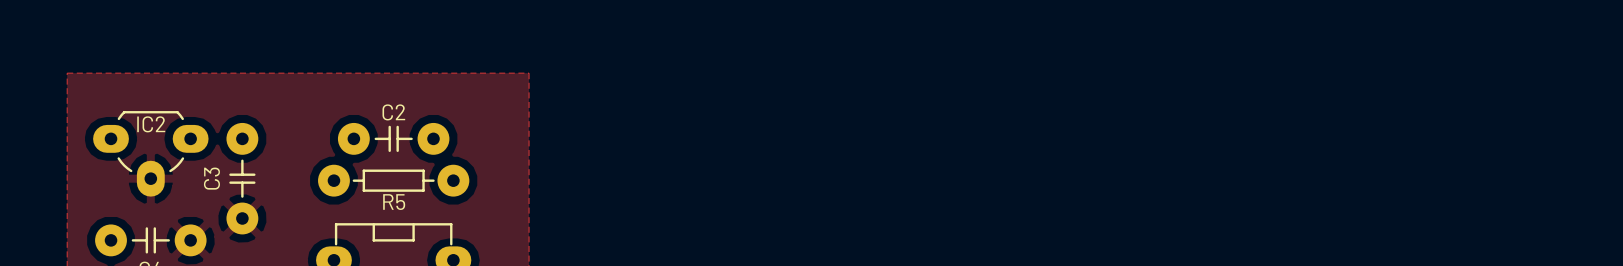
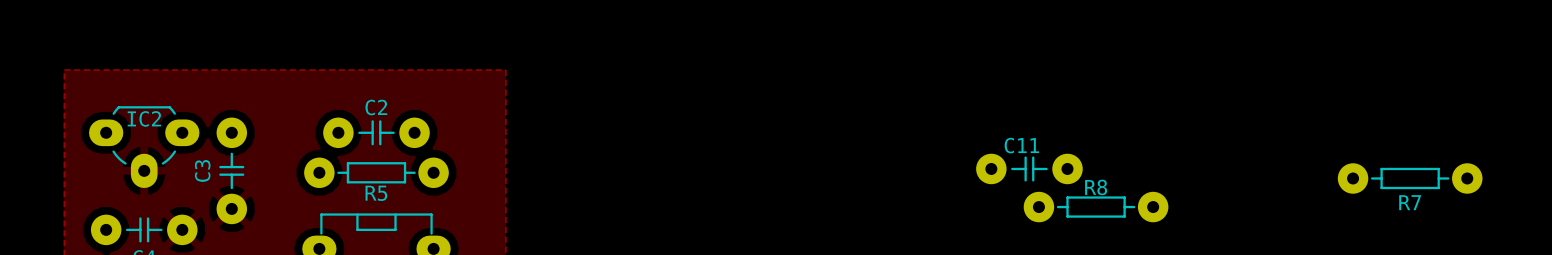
C11: none -> (1029, 168)
R7: none -> (1410, 178)
R8: none -> (1096, 207)

